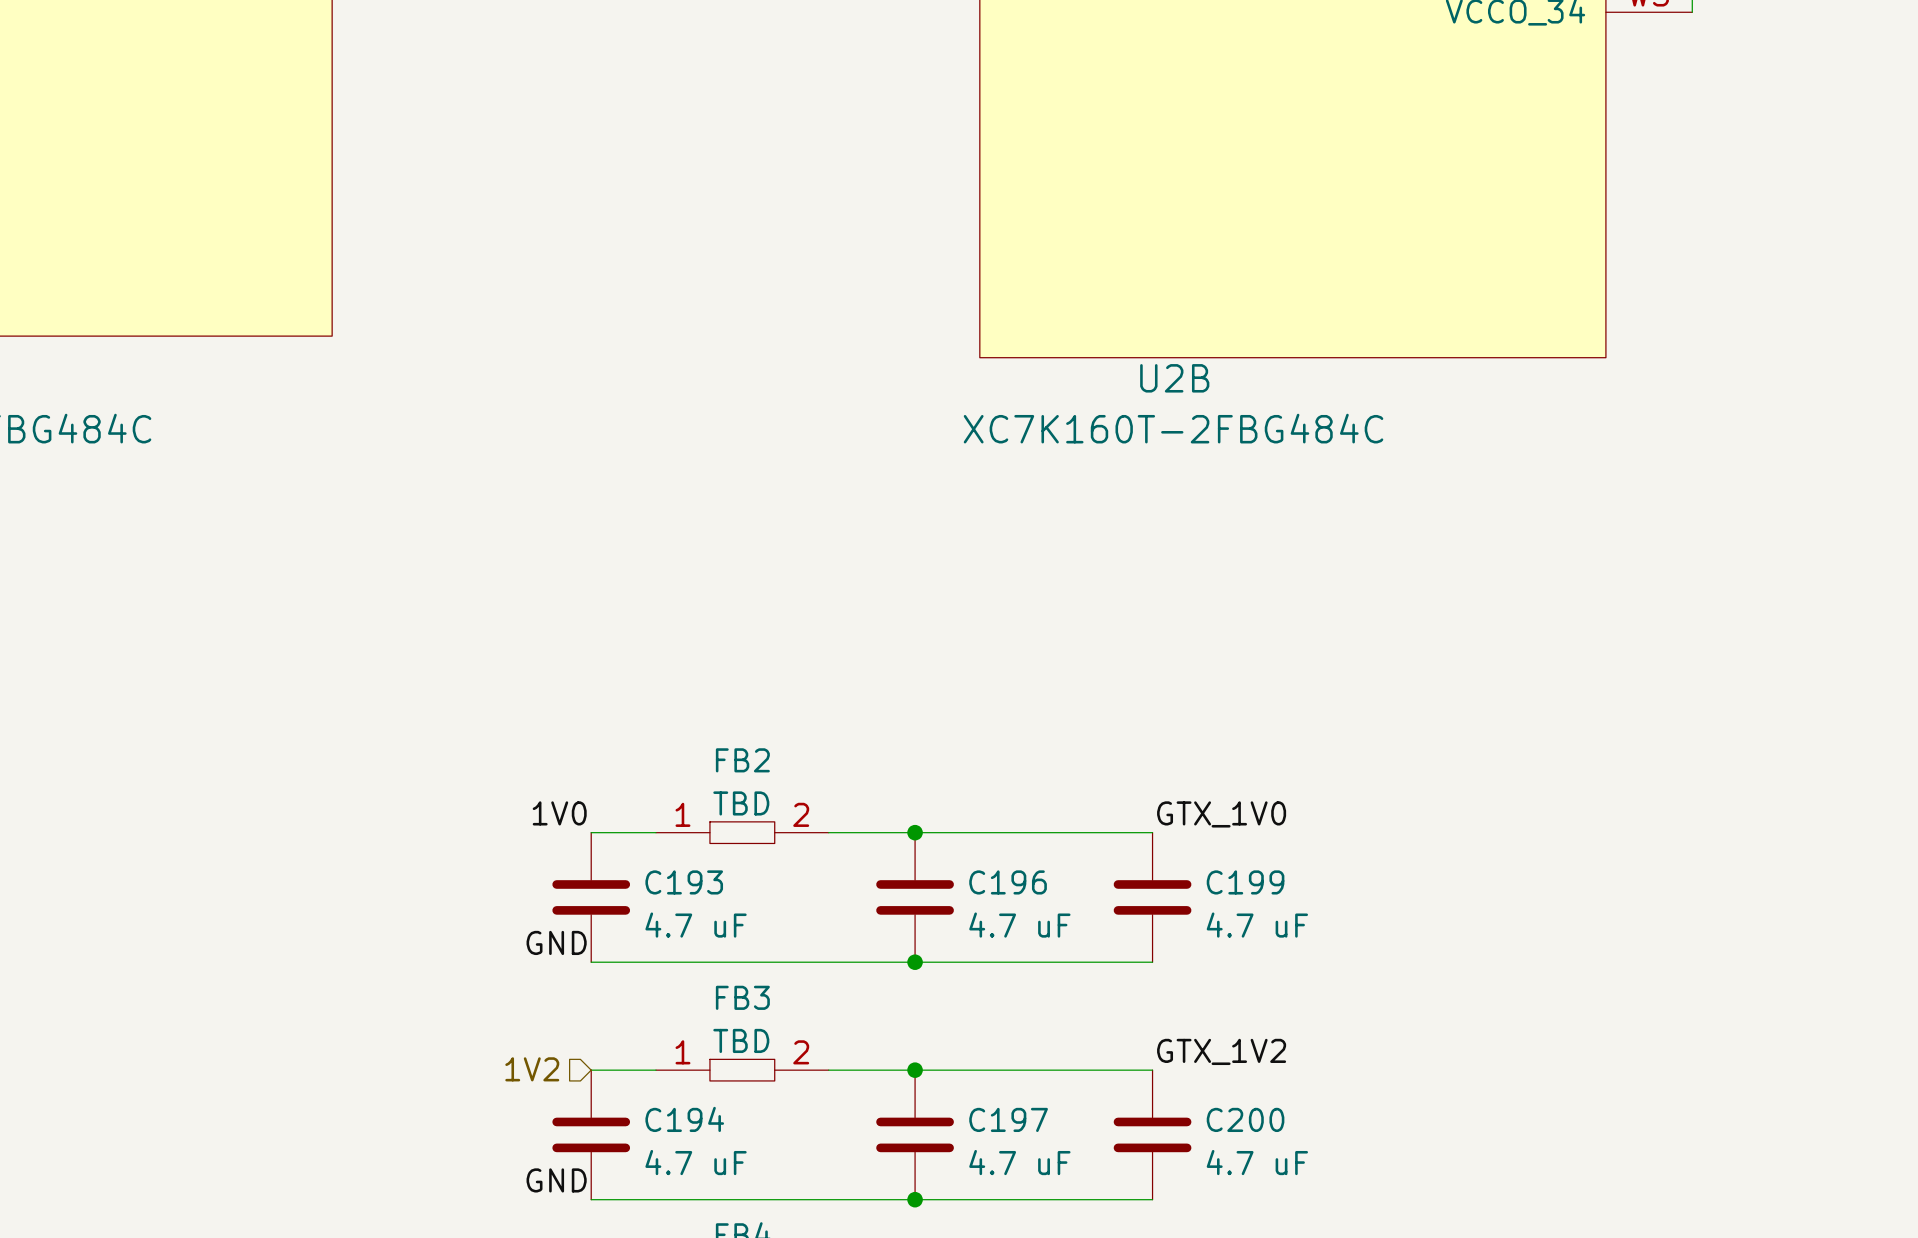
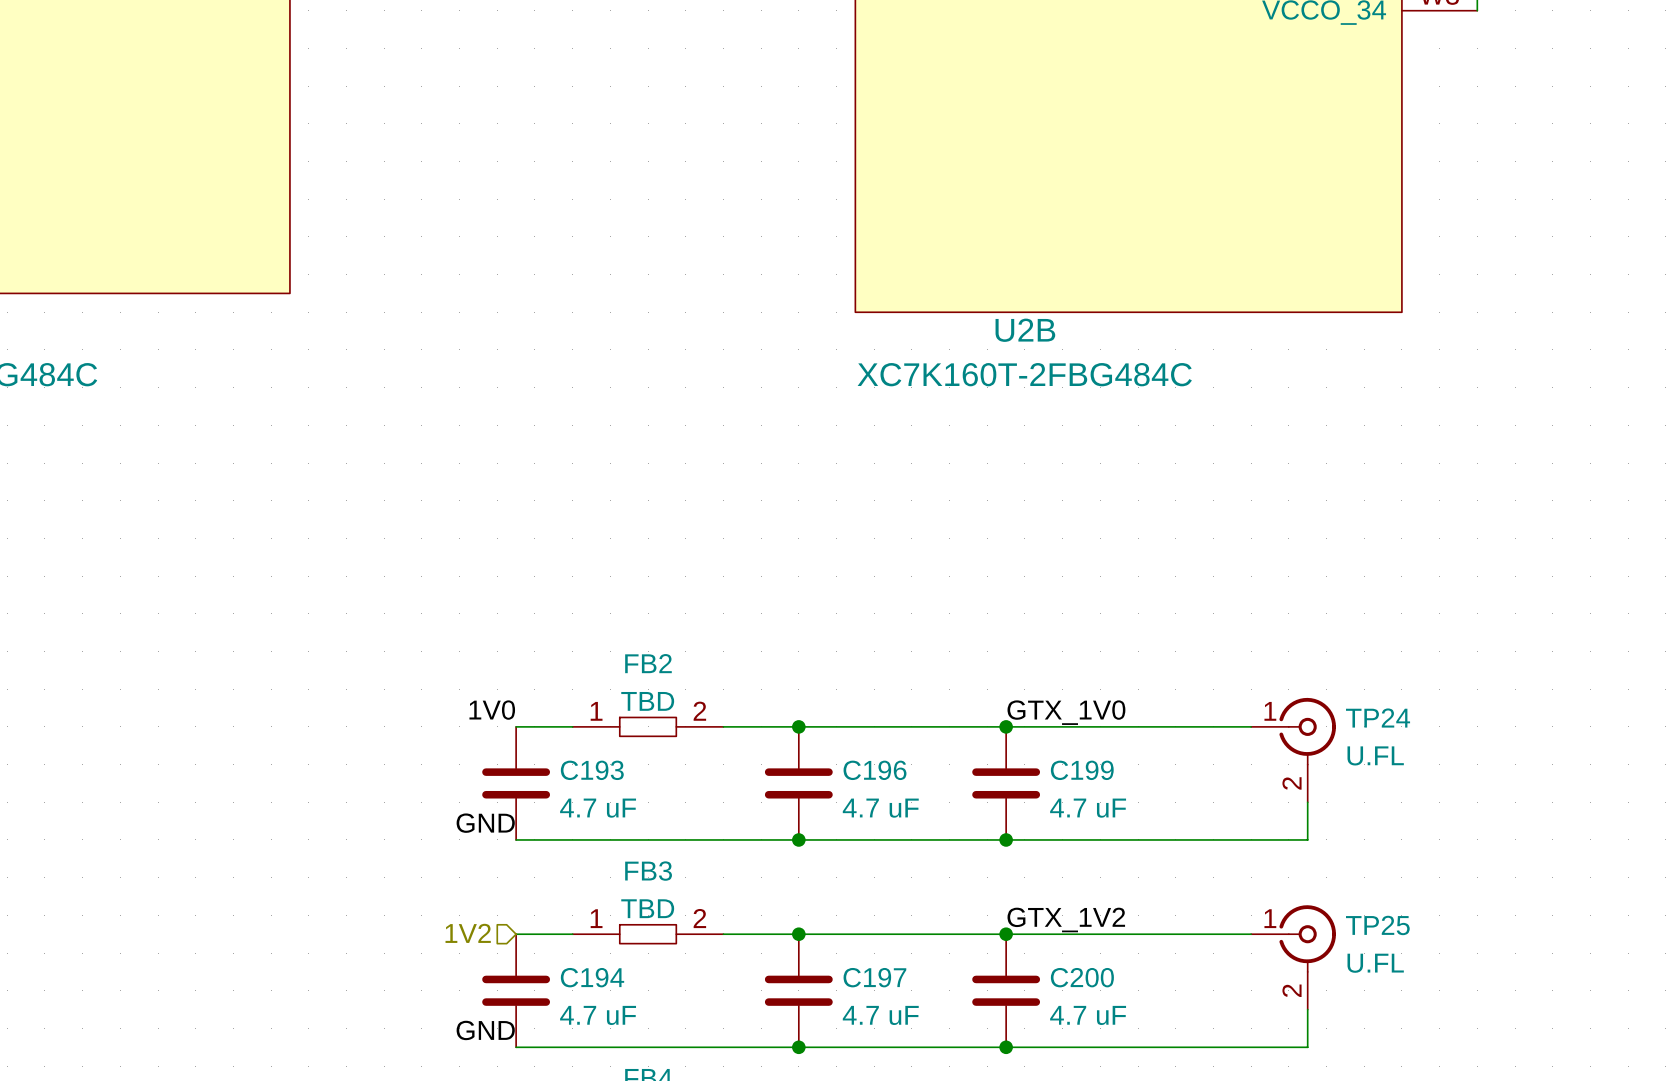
wire: none -> (1006, 726) (1251, 726)
junction: none -> (1006, 726)
TP24: none -> U.FL (1293, 750)
wire: none -> (1307, 802) (1307, 839) (1006, 839)
junction: none -> (1006, 839)
wire: none -> (1006, 934) (1251, 934)
junction: none -> (1006, 934)
TP25: none -> U.FL (1293, 957)
wire: none -> (1307, 1009) (1307, 1047) (1006, 1047)
junction: none -> (1006, 1047)

